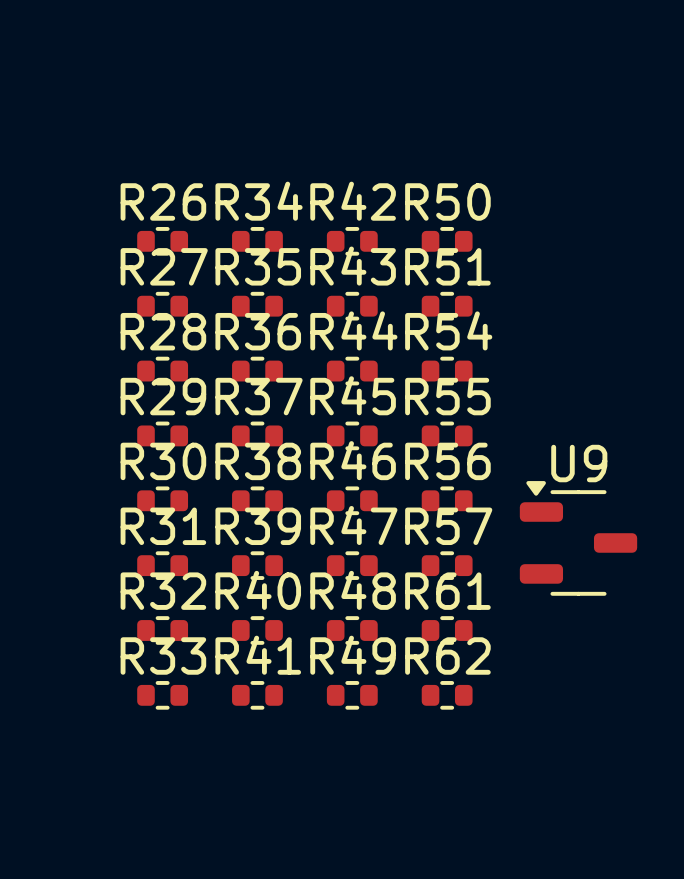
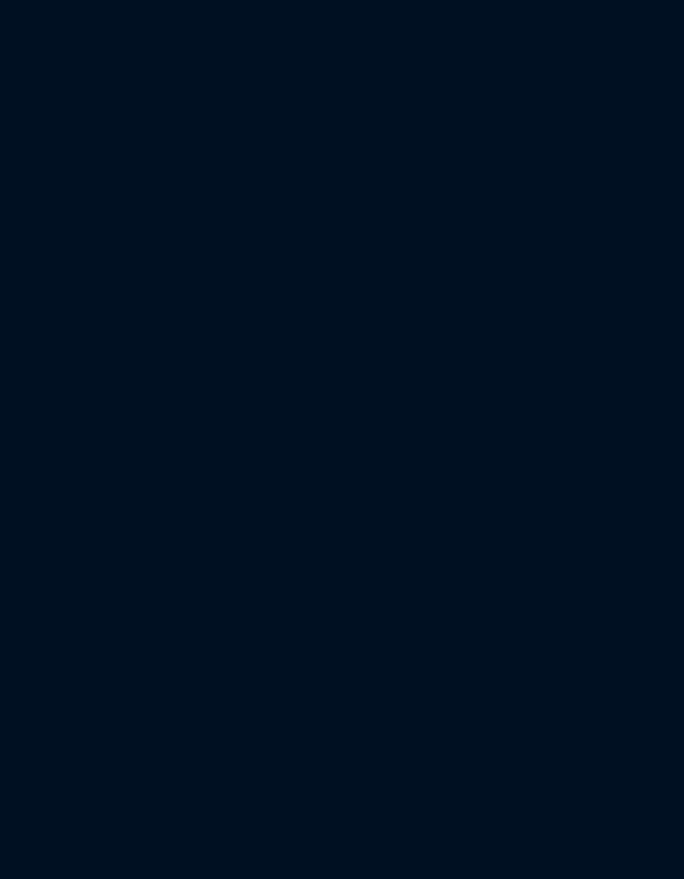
R26: (162, 241) -> none
R34: (257, 241) -> none
R42: (352, 241) -> none
R50: (447, 241) -> none
R27: (162, 306) -> none
R35: (257, 306) -> none
R43: (352, 306) -> none
R51: (447, 306) -> none
R28: (162, 371) -> none
R36: (257, 371) -> none
R44: (352, 371) -> none
R54: (447, 371) -> none
R29: (162, 435) -> none
R37: (257, 435) -> none
R45: (352, 435) -> none
R55: (447, 435) -> none
R30: (162, 500) -> none
R38: (257, 500) -> none
R46: (352, 500) -> none
R56: (447, 500) -> none
U9: (578, 538) -> none
R31: (162, 565) -> none
R39: (257, 565) -> none
R47: (352, 565) -> none
R57: (447, 565) -> none
R32: (162, 630) -> none
R40: (257, 630) -> none
R48: (352, 630) -> none
R61: (447, 630) -> none
R33: (162, 695) -> none
R41: (257, 695) -> none
R49: (352, 695) -> none
R62: (447, 695) -> none

